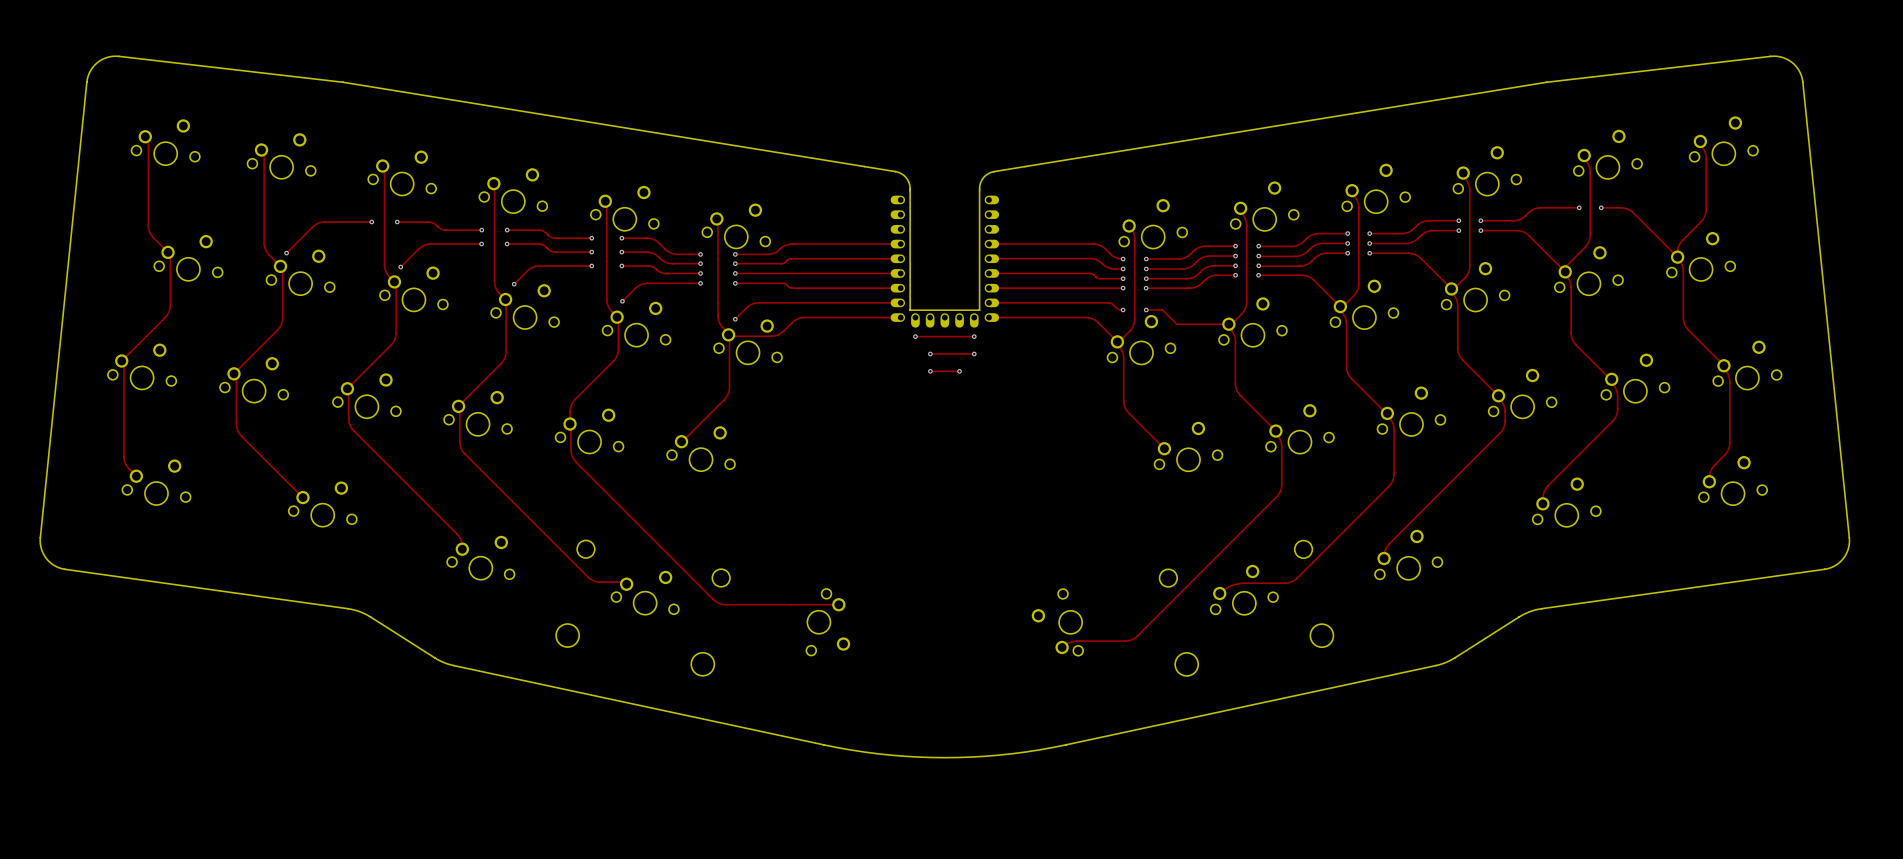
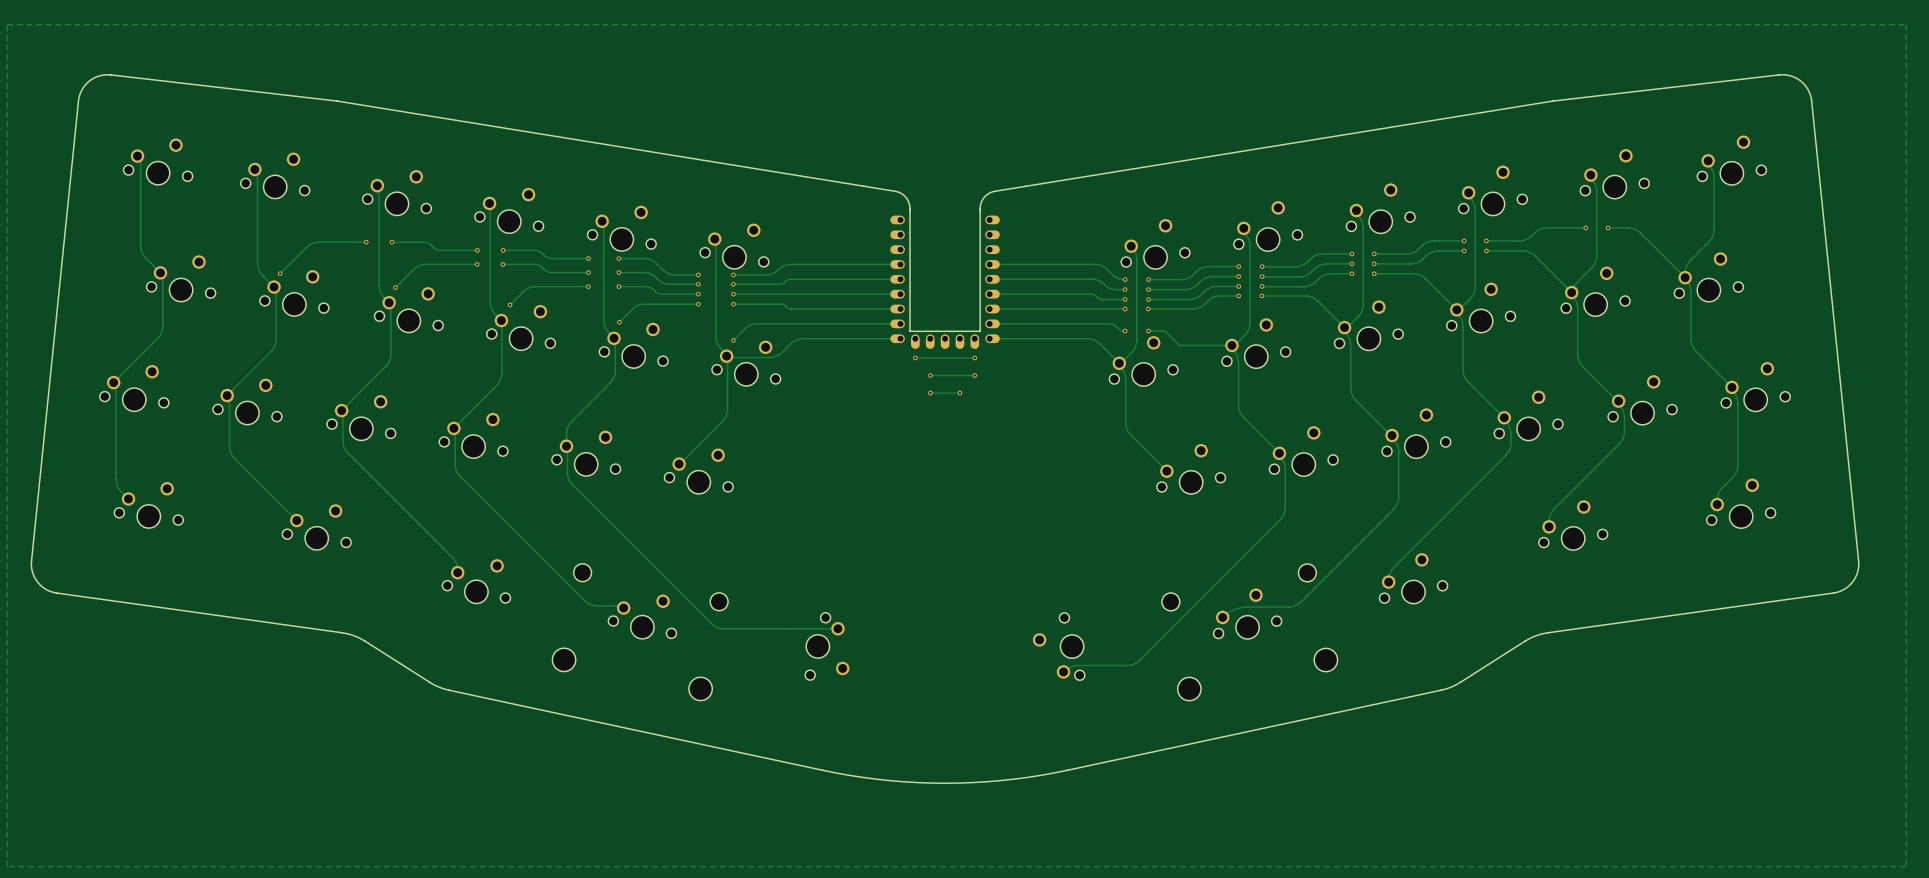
zone outline: none -> (7, 24) (1906, 24) (1906, 866) (7, 866) (7, 24)

